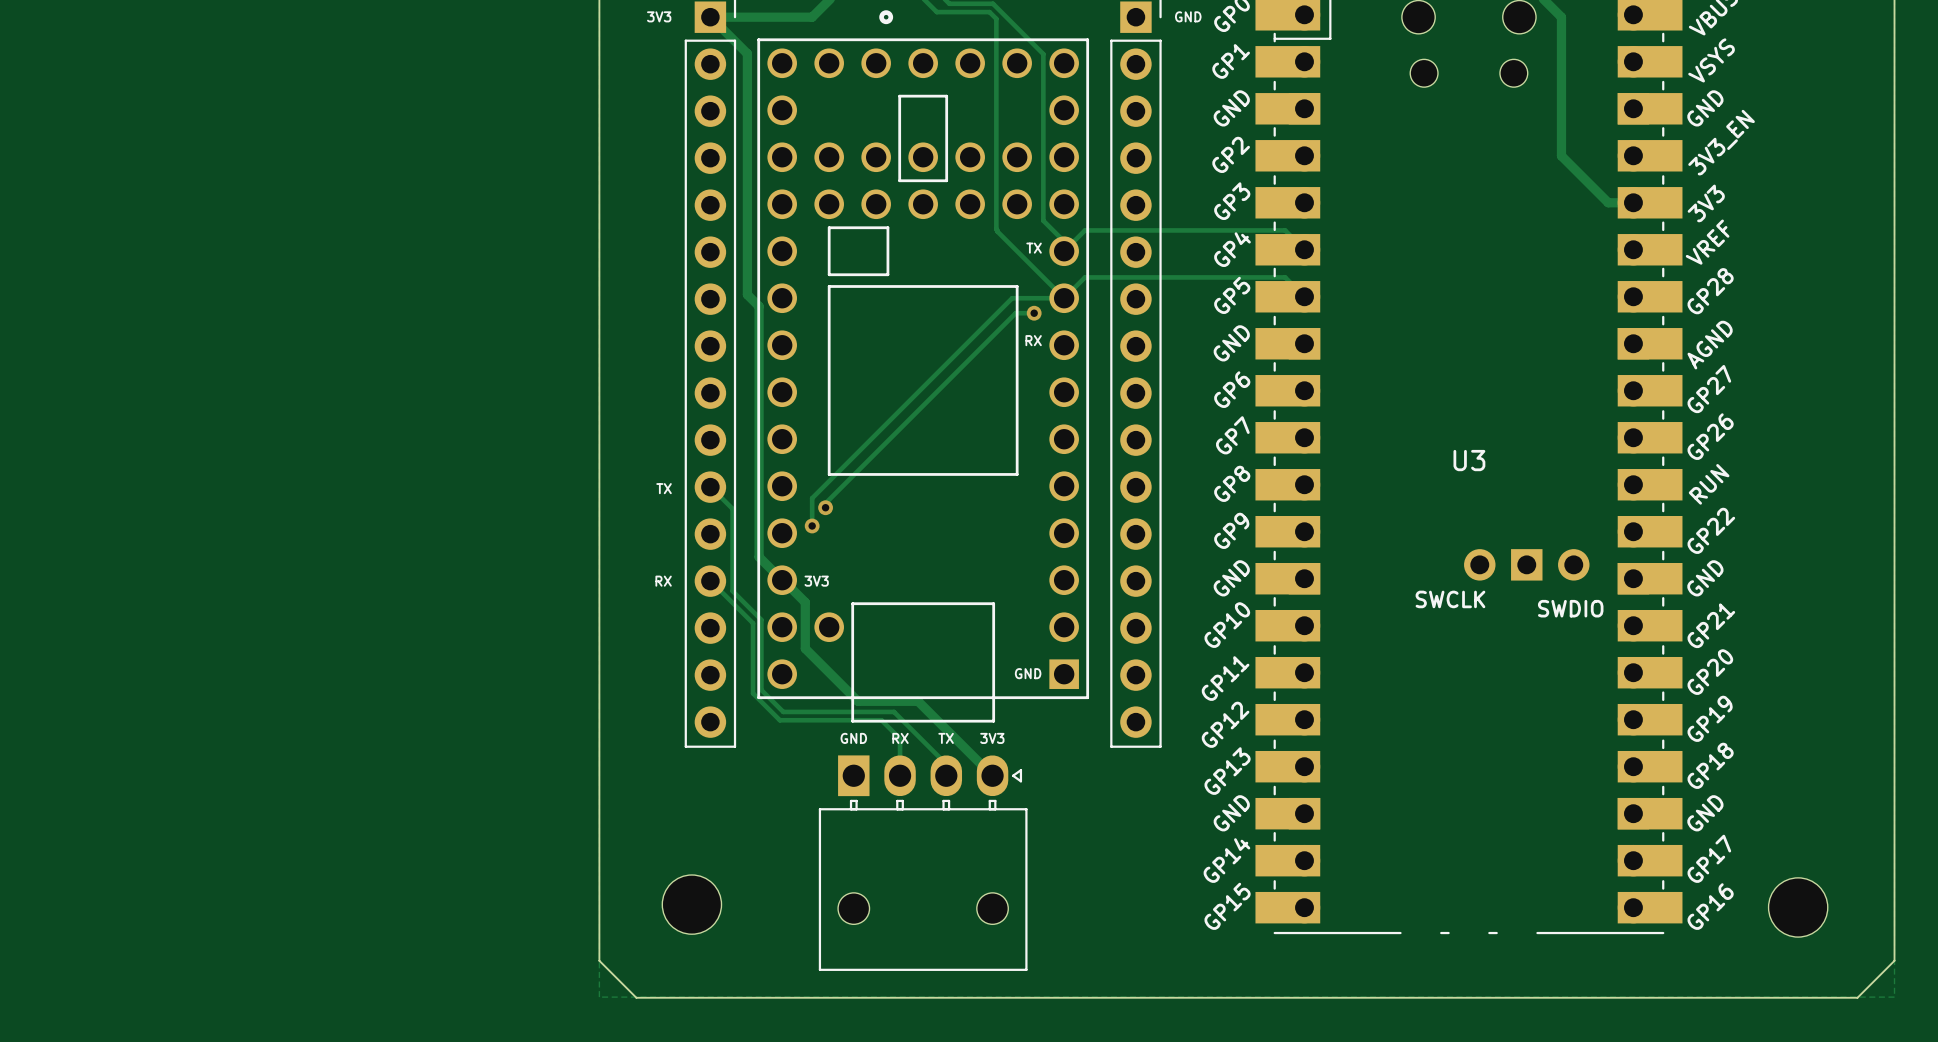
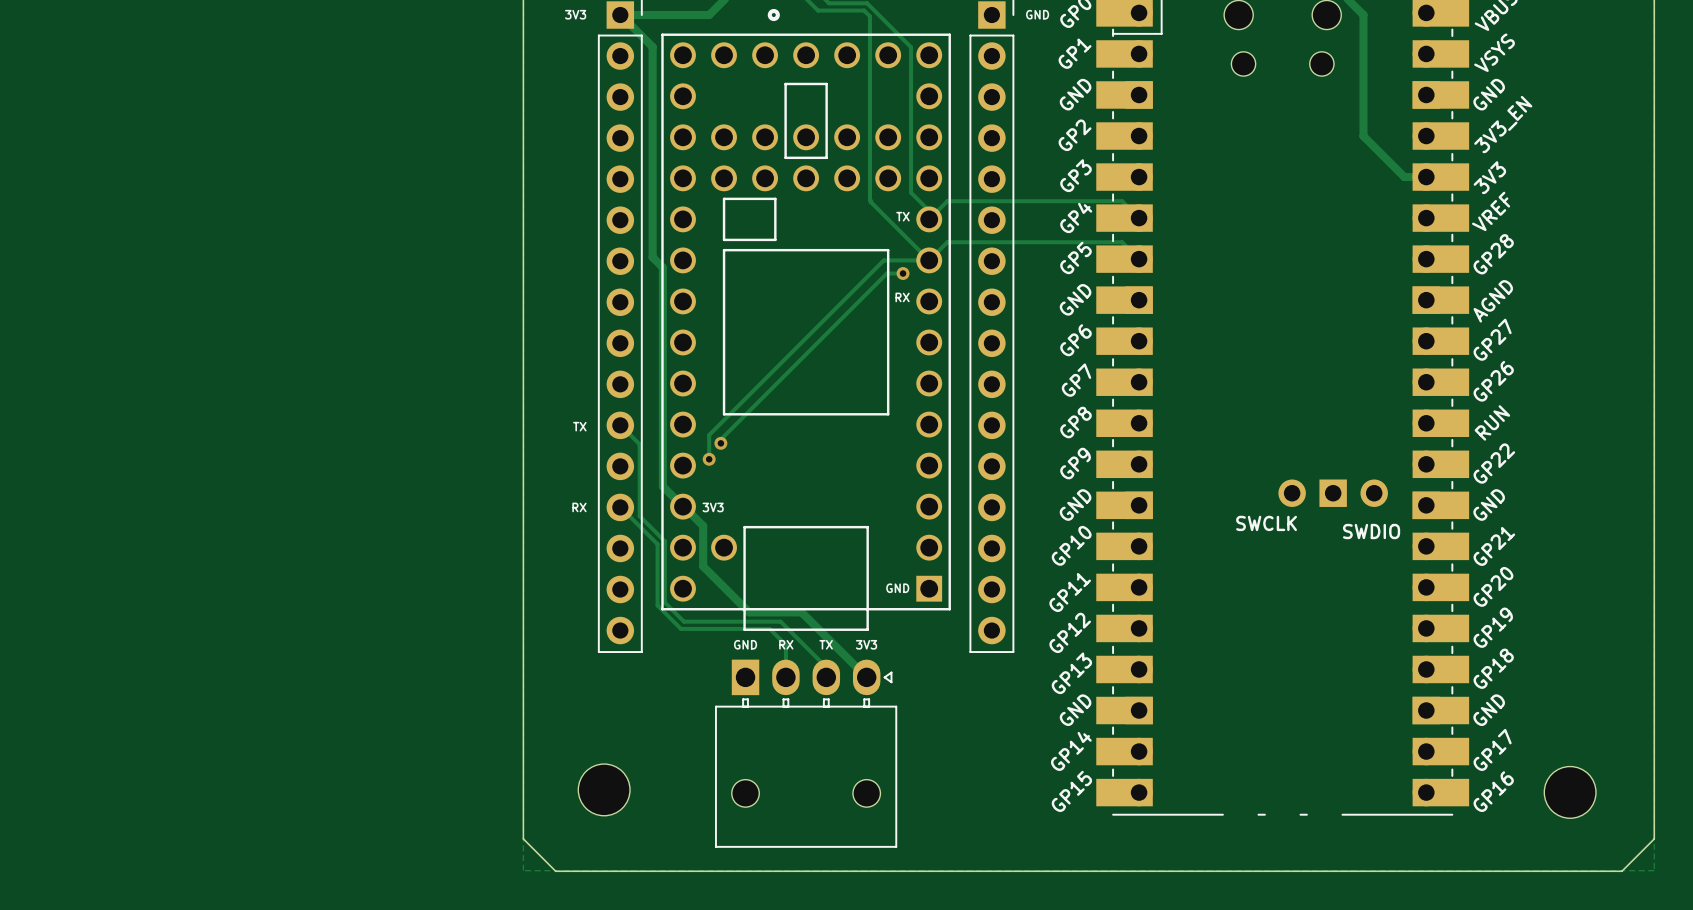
U3 name: U3 (1469, 460) -> none

